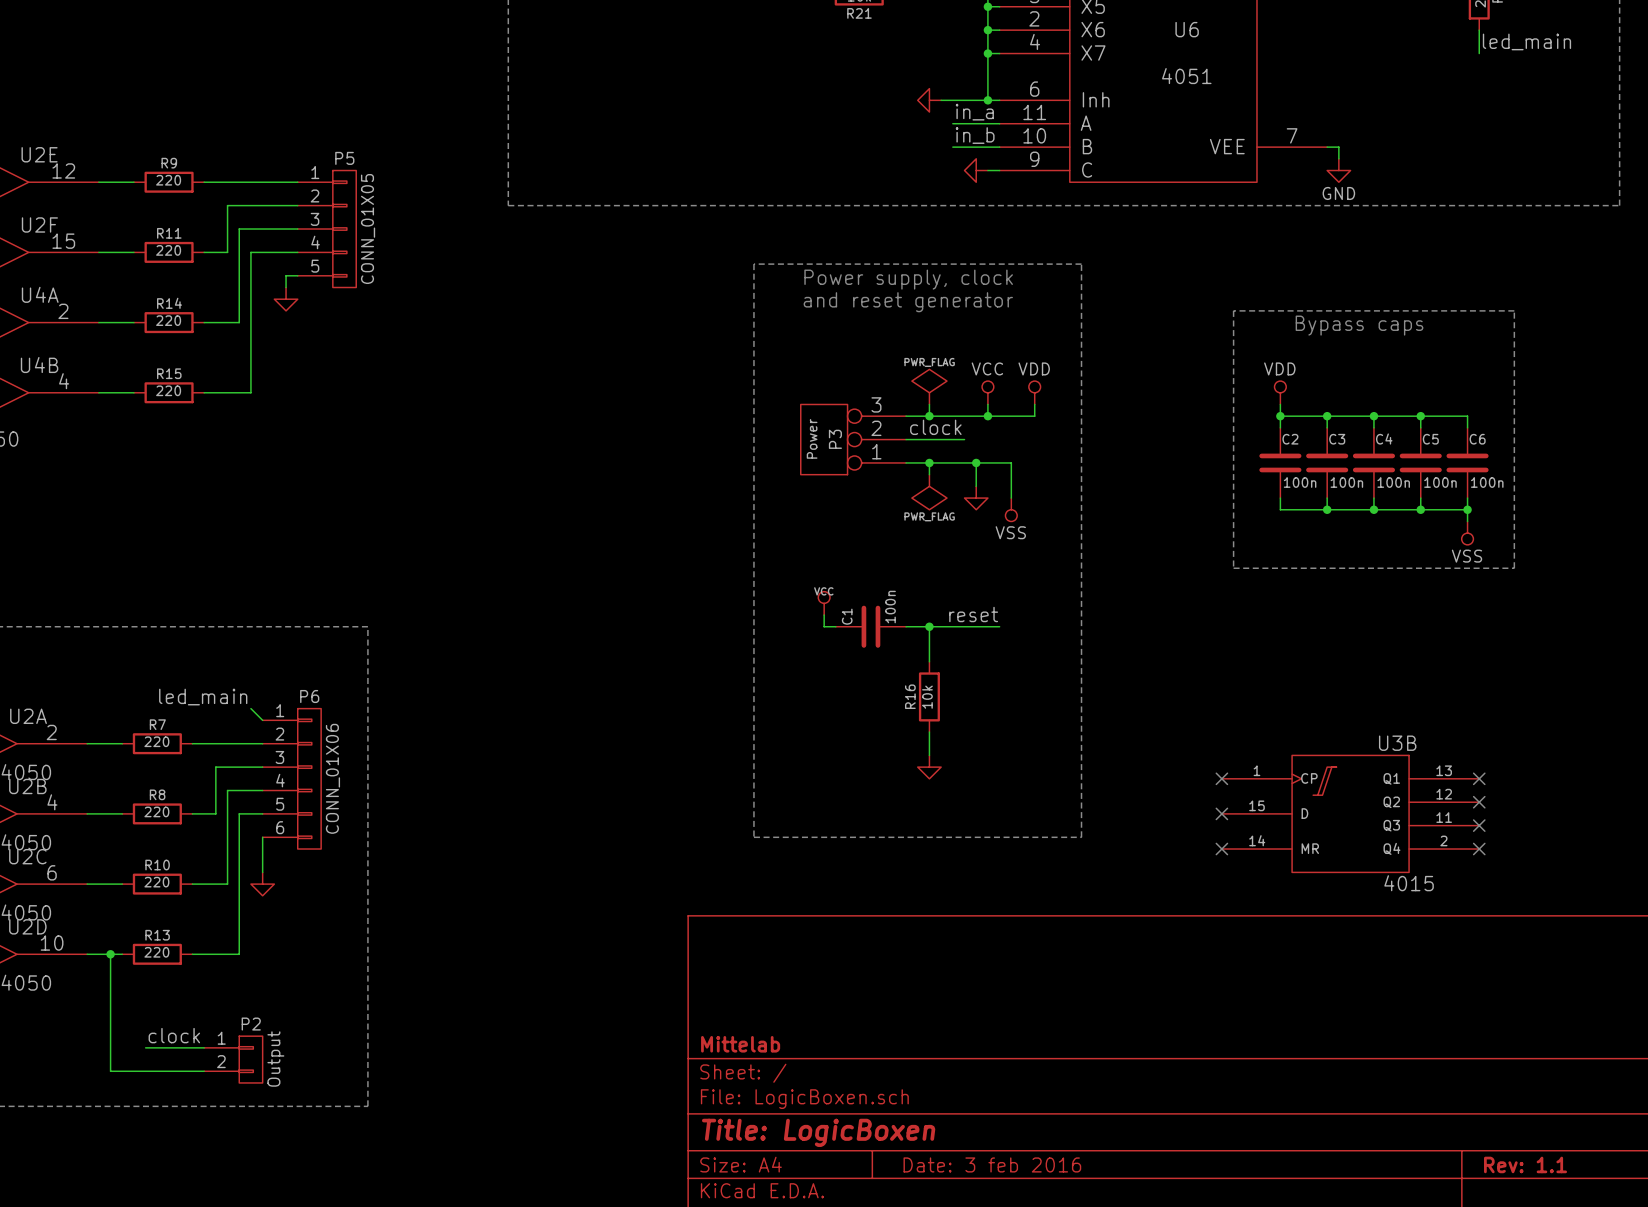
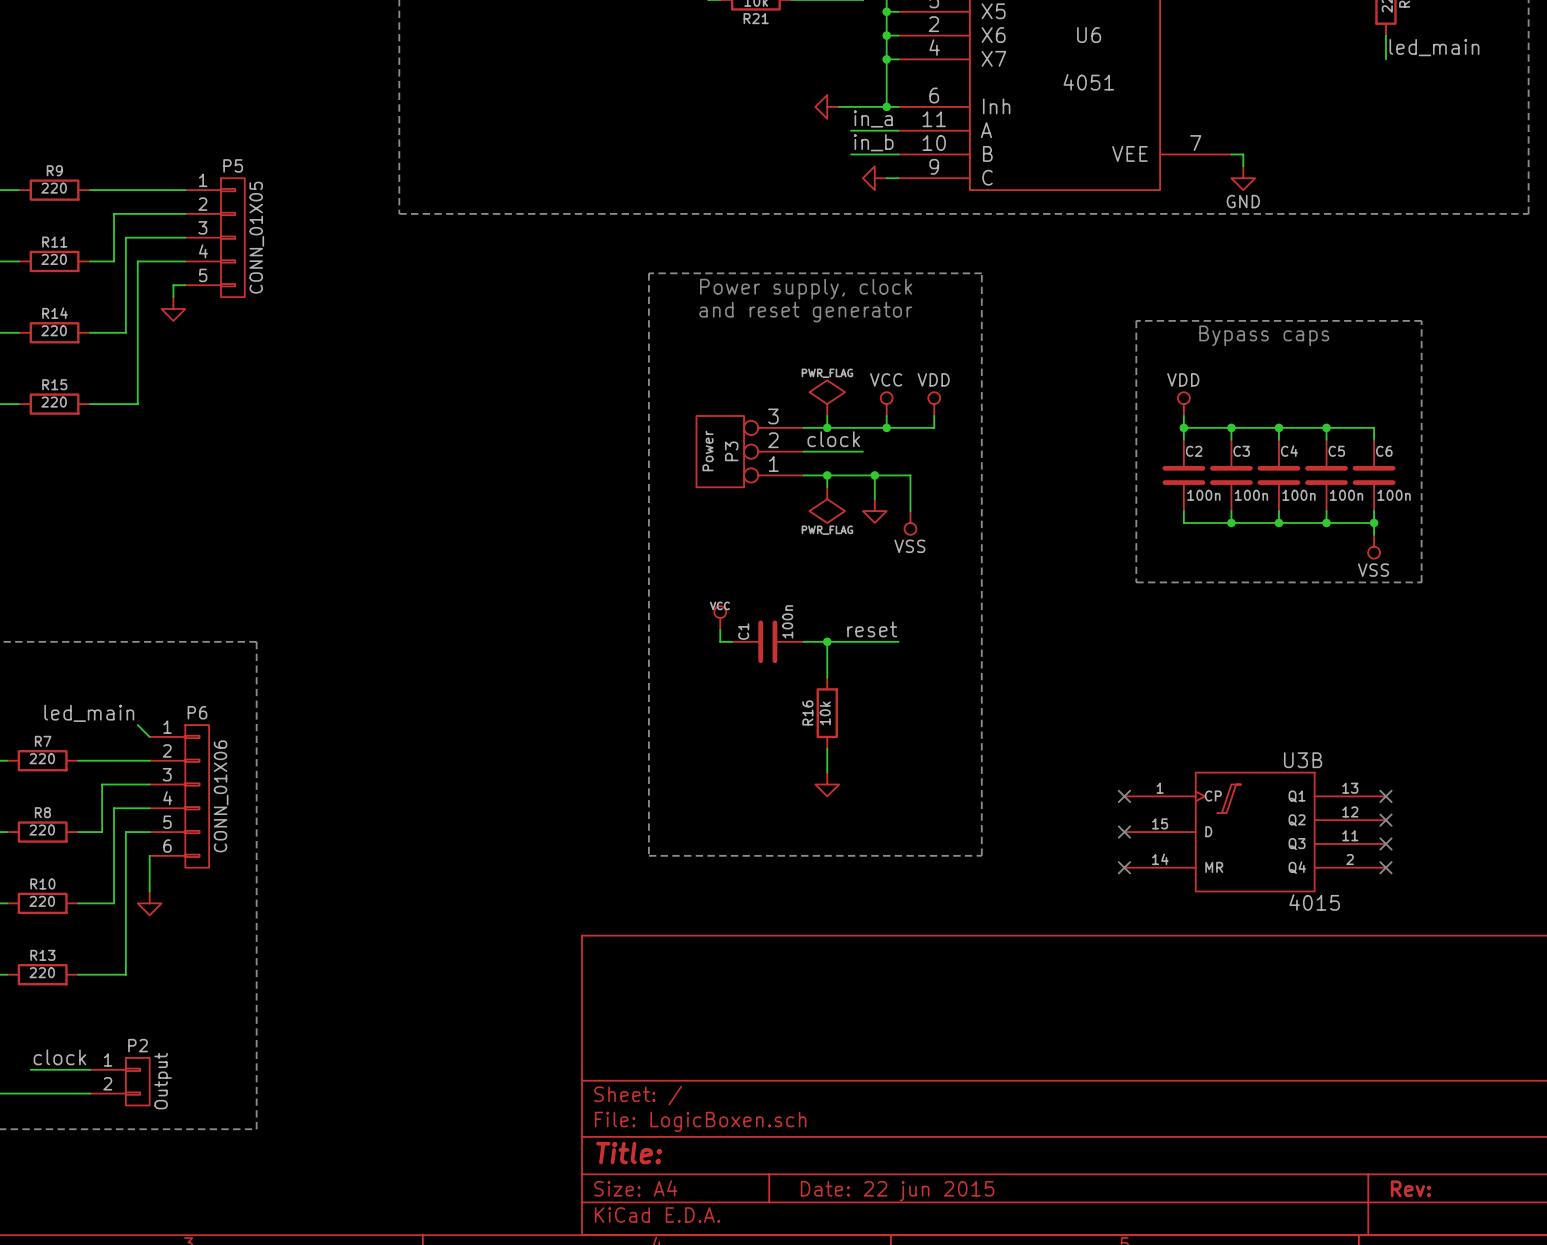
title block: Mittelab (740, 1044) -> none
title block: Title: LogicBoxen (818, 1132) -> Title: (629, 1153)
title block: Date: 3 feb 2016 (992, 1164) -> Date: 22 jun 2015 (897, 1191)
title block: Rev: 1.1 (1525, 1164) -> Rev: (1410, 1188)

